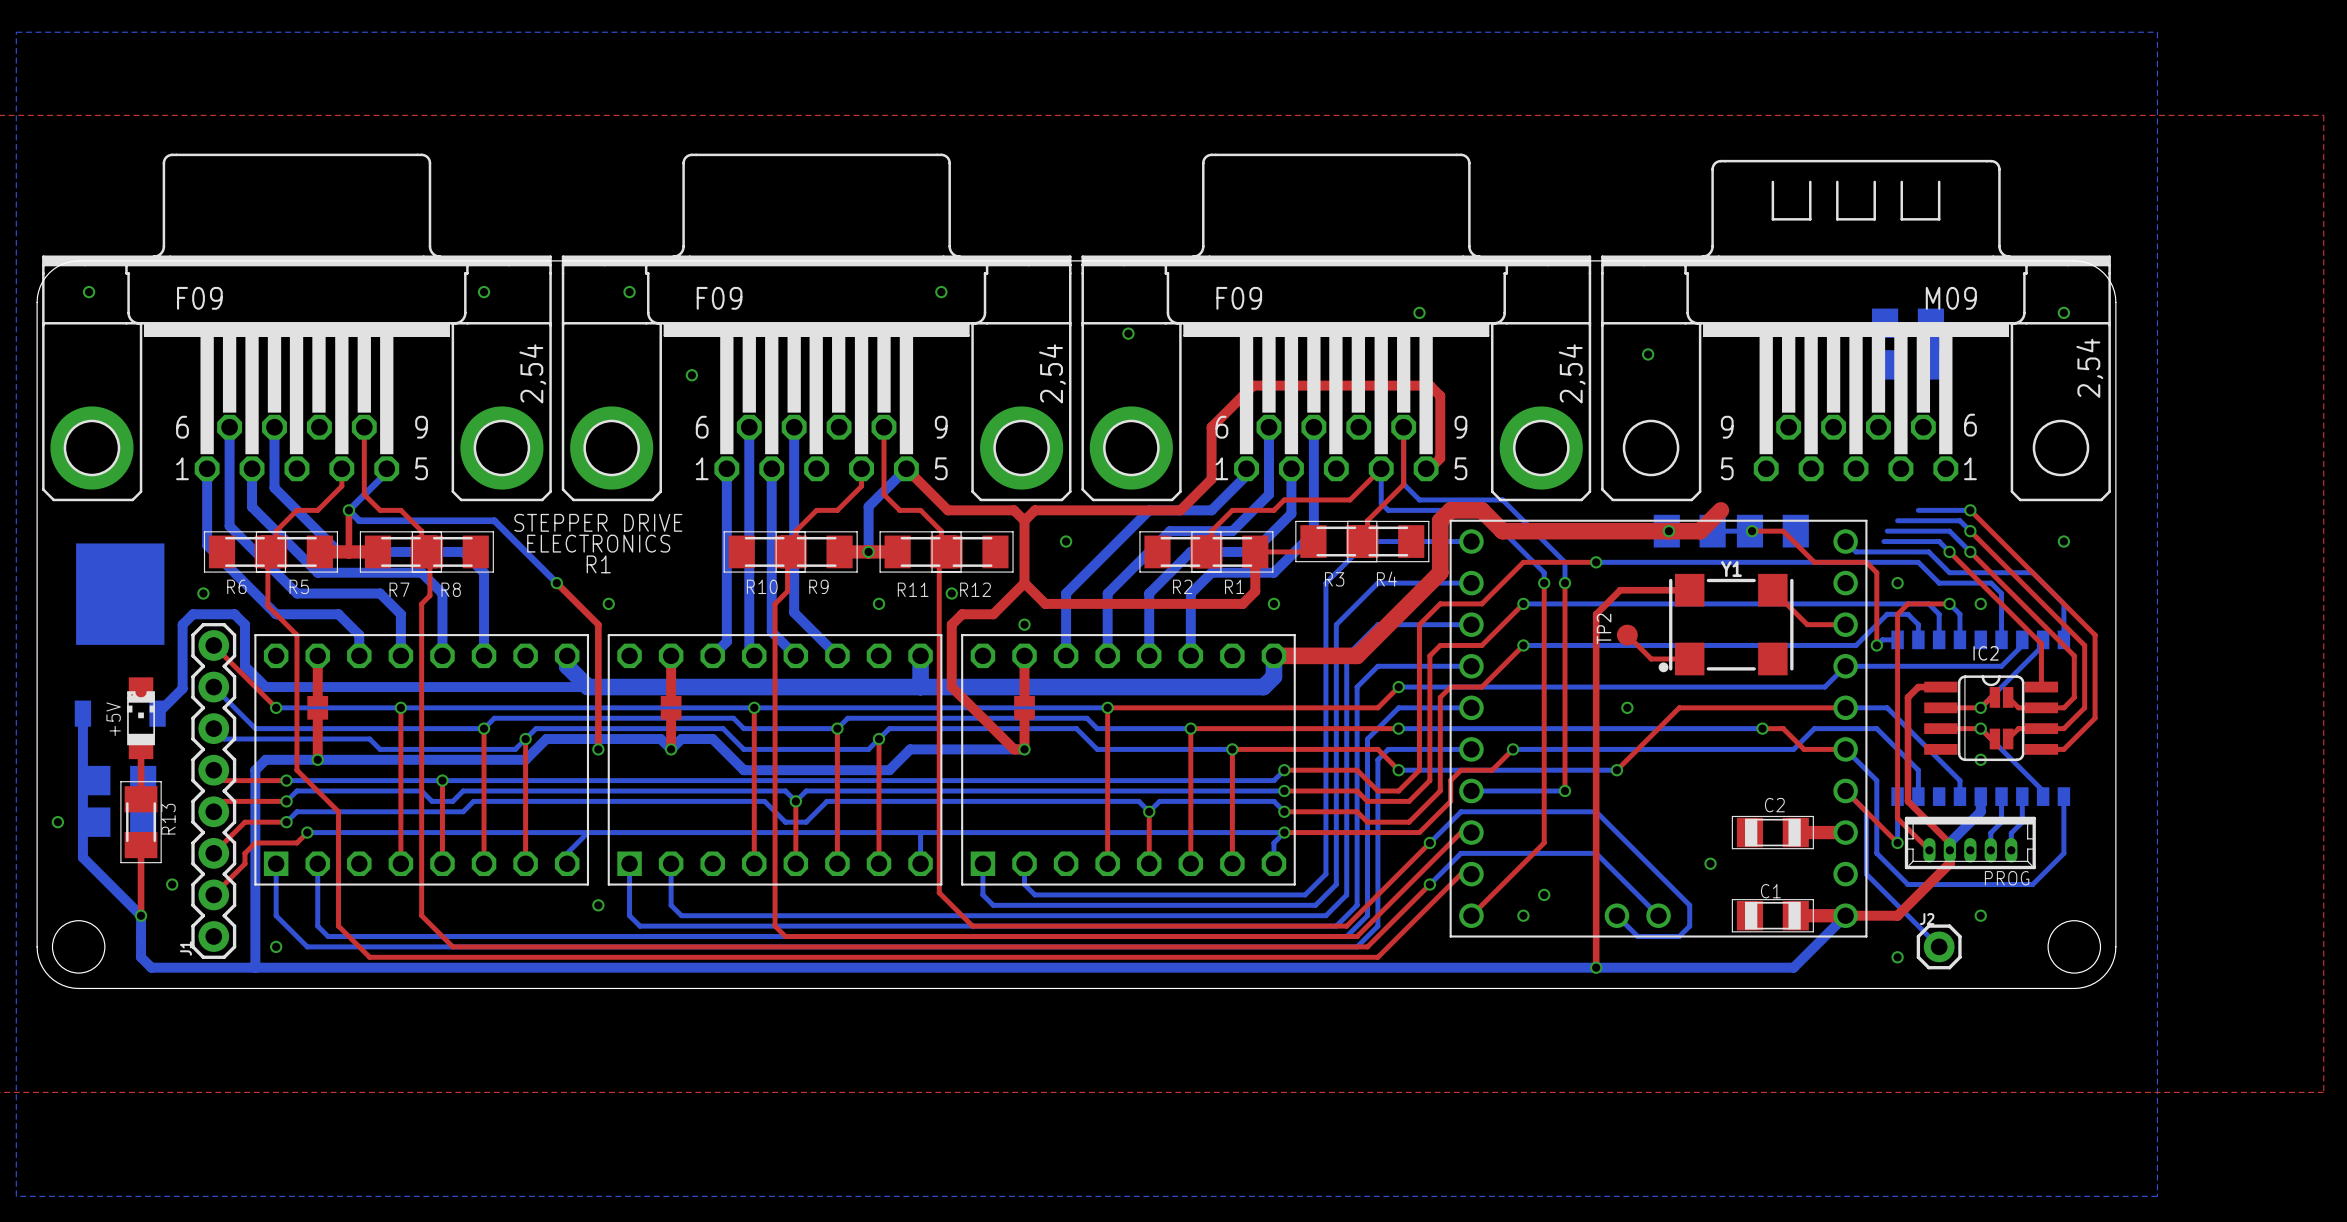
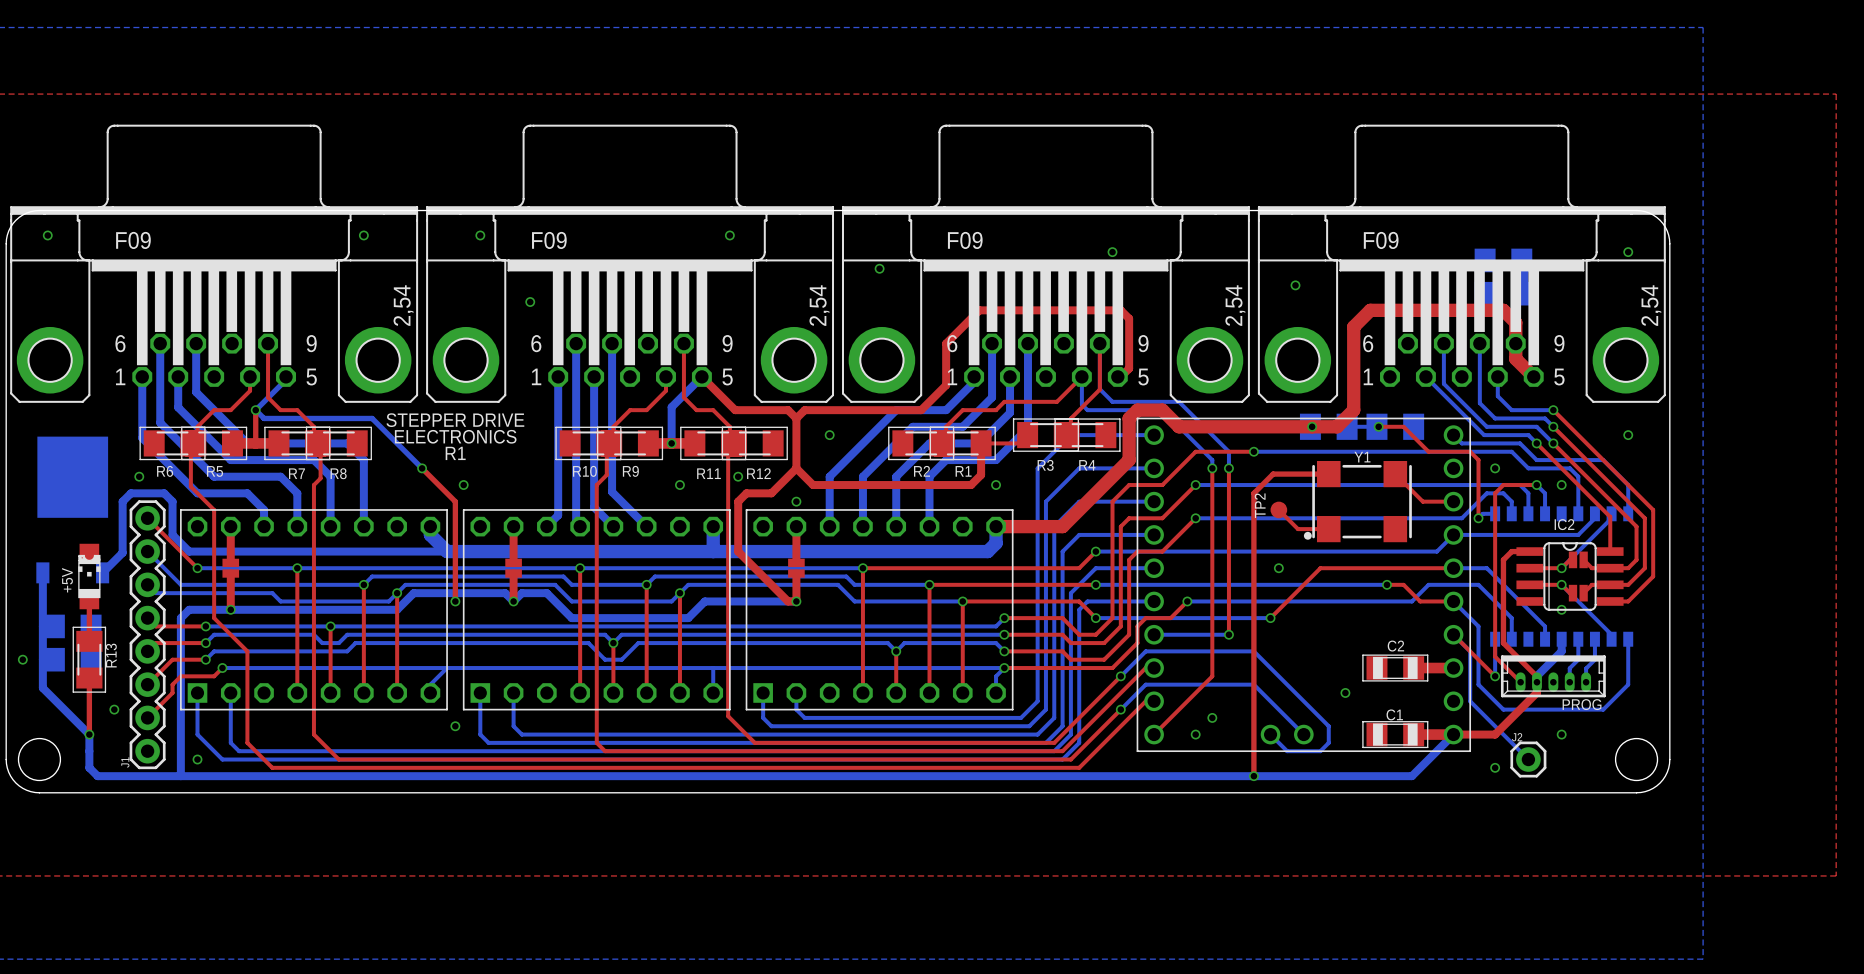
part footprint: [1601, 159, 2111, 502] -> [1257, 124, 1666, 403]
bottom track: none -> (1443, 343) (1443, 383) (1486, 426)
bottom track: none -> (1479, 343) (1479, 403) (1495, 418)
bottom track: none -> (1425, 376) (1484, 435)
bottom track: none -> (1497, 376) (1497, 396) (1511, 410)
top track: none -> (1533, 376) (1515, 358) (1515, 322) (1503, 310) (1370, 310) (1353, 326) (1353, 410)

